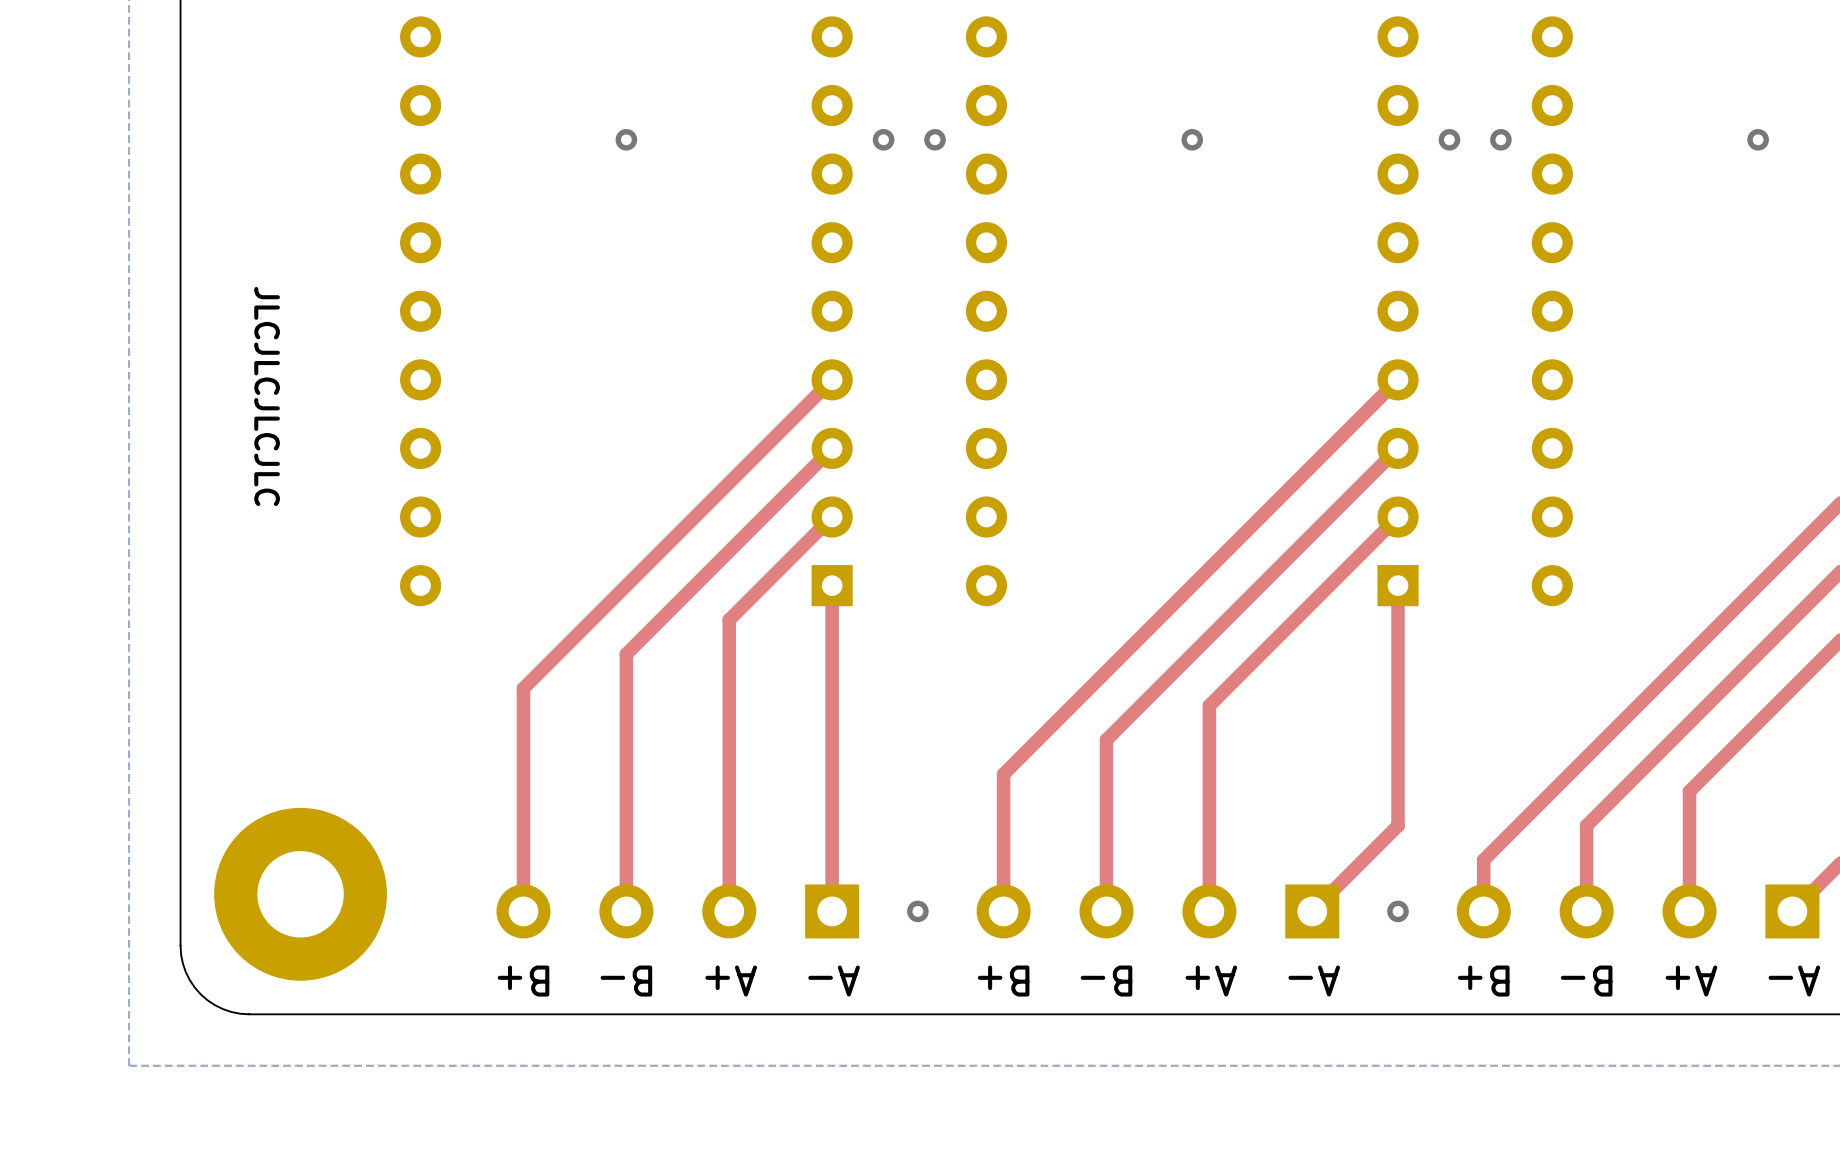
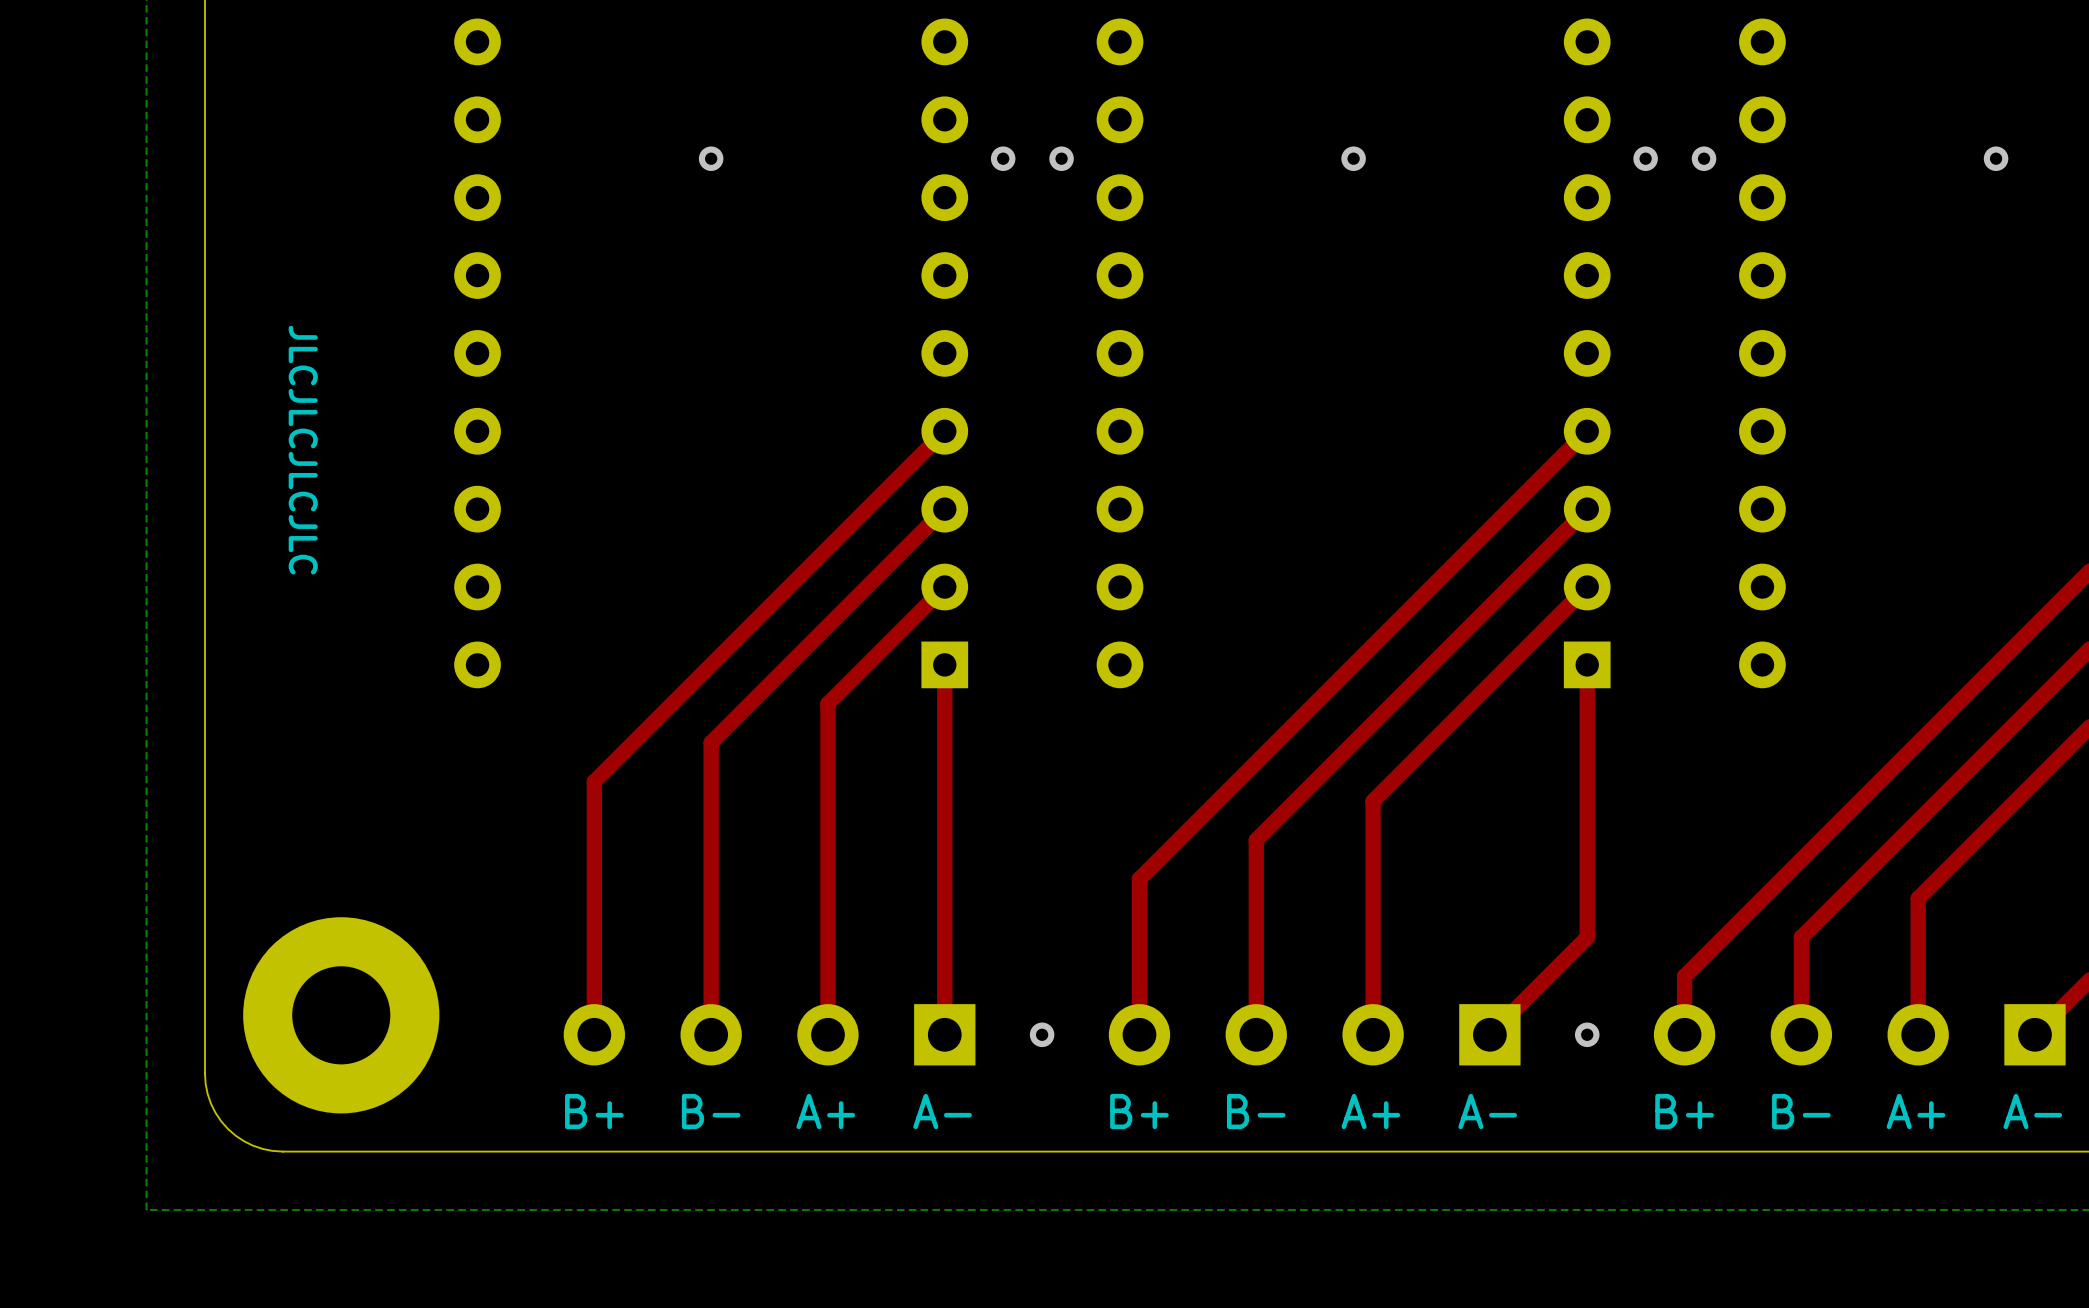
text rotation: 0° (523, 981) -> 180° (594, 1111)
text rotation: 0° (626, 981) -> 180° (711, 1111)
text rotation: 0° (731, 981) -> 180° (825, 1111)
text rotation: 0° (834, 981) -> 180° (942, 1111)
text rotation: 0° (1003, 981) -> 180° (1139, 1111)
text rotation: 0° (1106, 981) -> 180° (1256, 1111)
text rotation: 0° (1211, 981) -> 180° (1370, 1111)
text rotation: 0° (1314, 981) -> 180° (1487, 1111)
text rotation: 0° (1483, 981) -> 180° (1684, 1111)
text rotation: 0° (1586, 981) -> 180° (1801, 1111)
text rotation: 0° (1691, 981) -> 180° (1915, 1111)
text rotation: 0° (1794, 981) -> 180° (2032, 1111)

